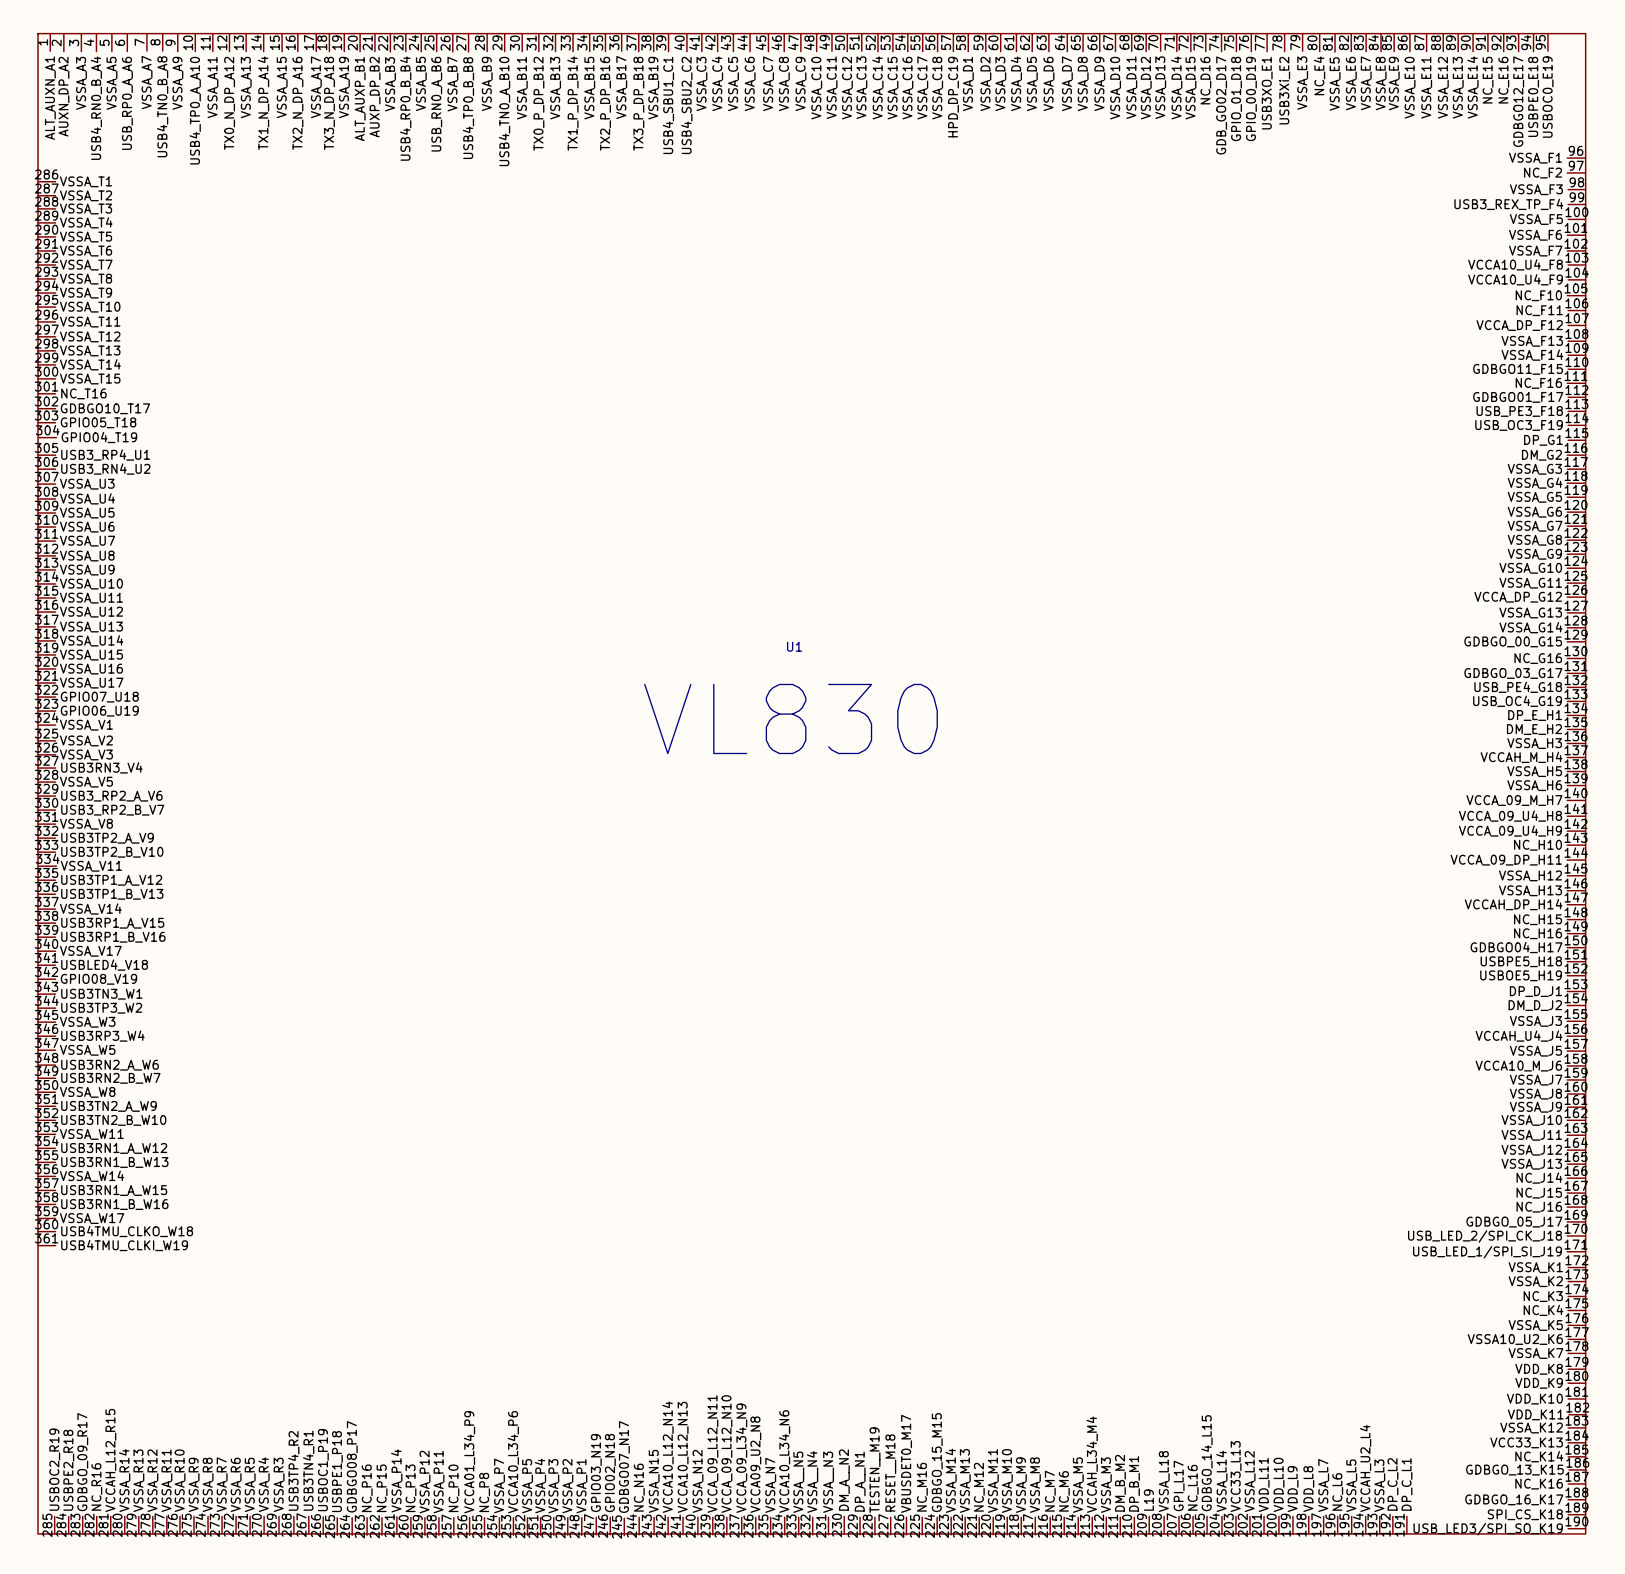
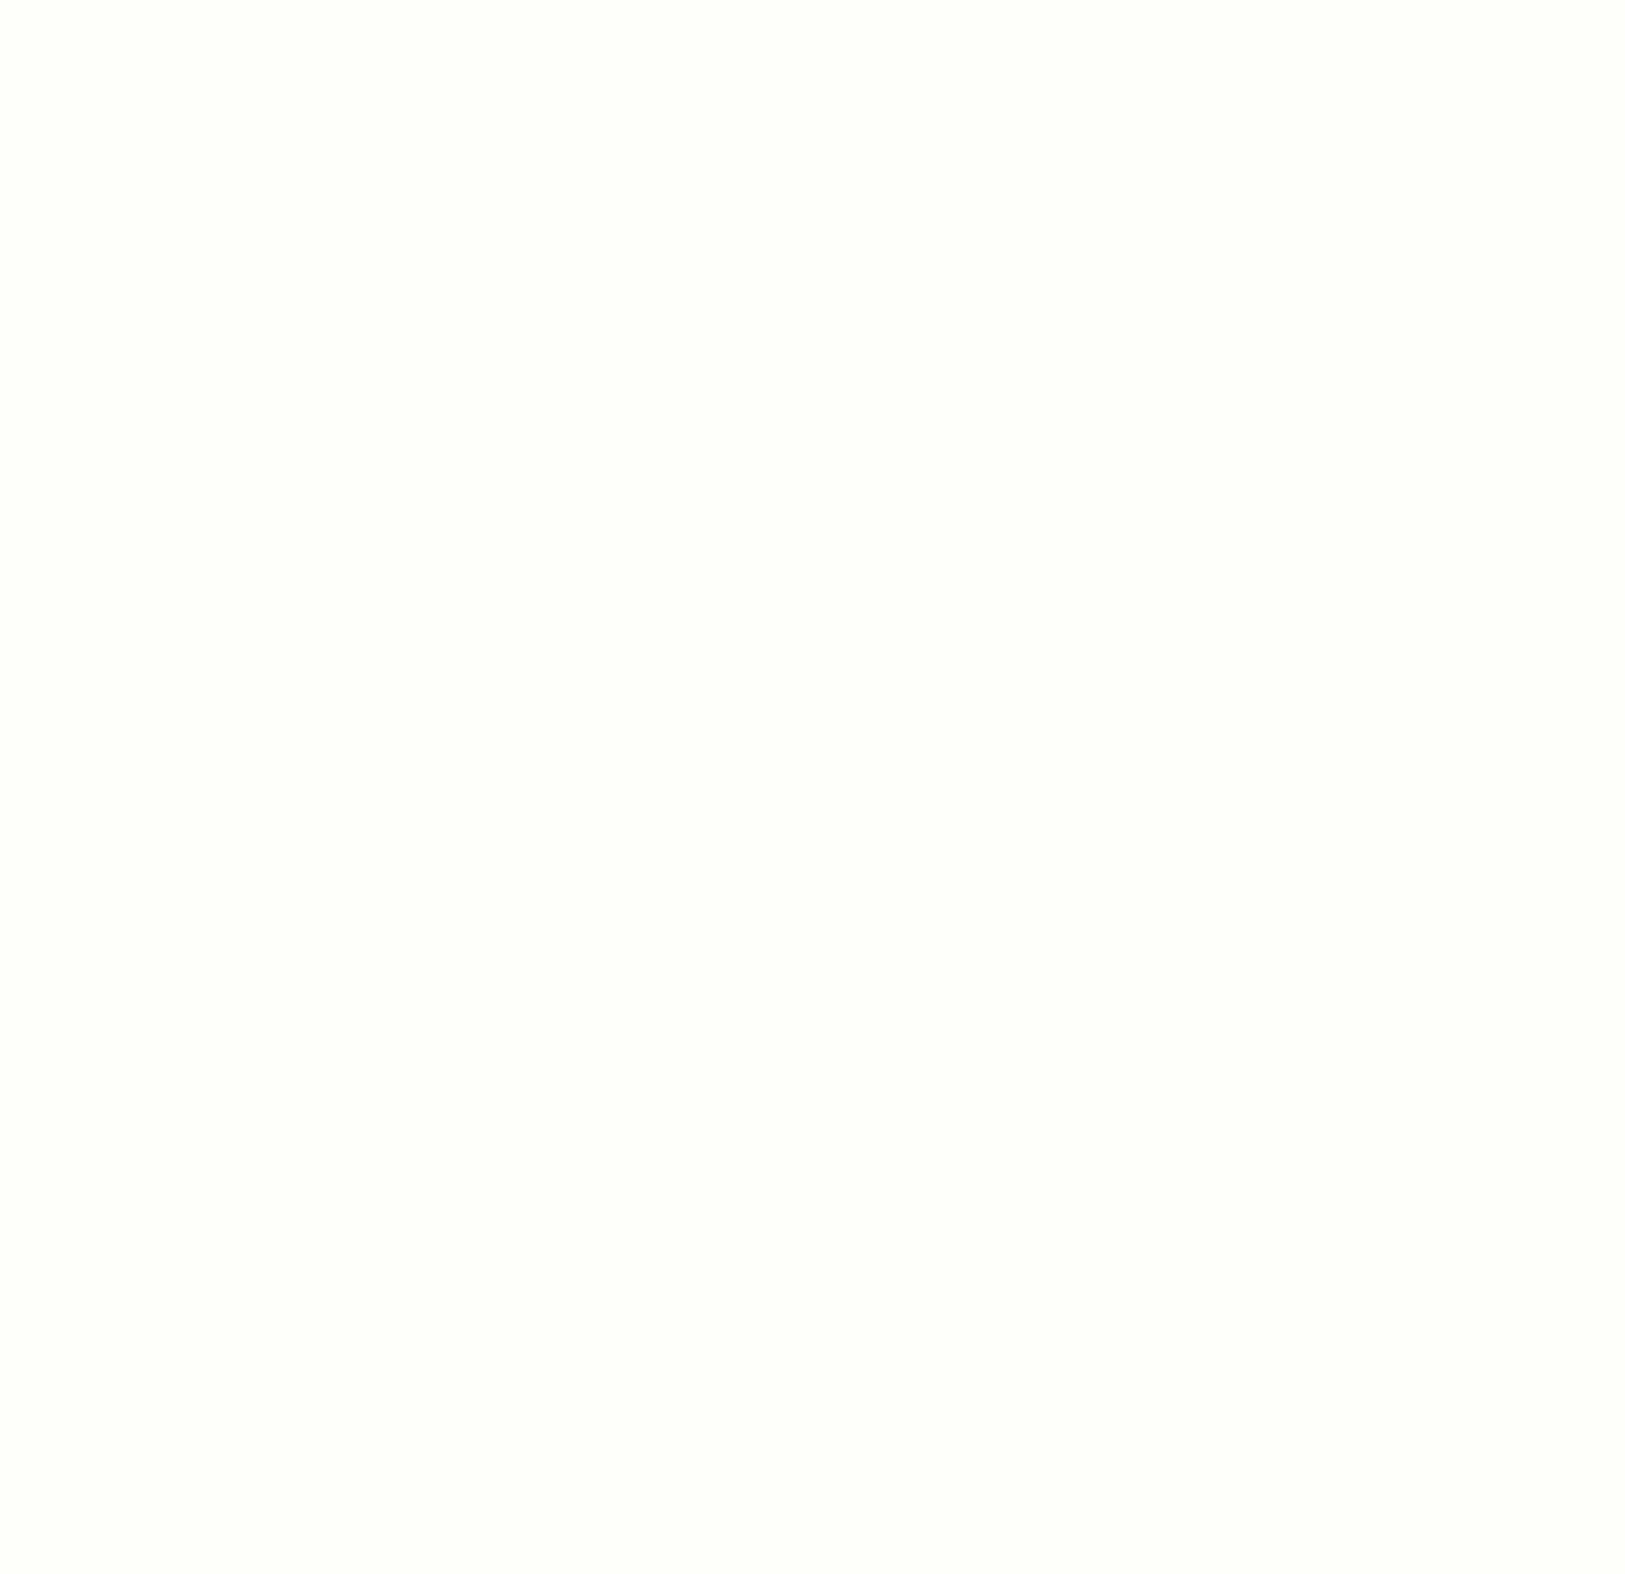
U1: VL830 (812, 784) -> none

